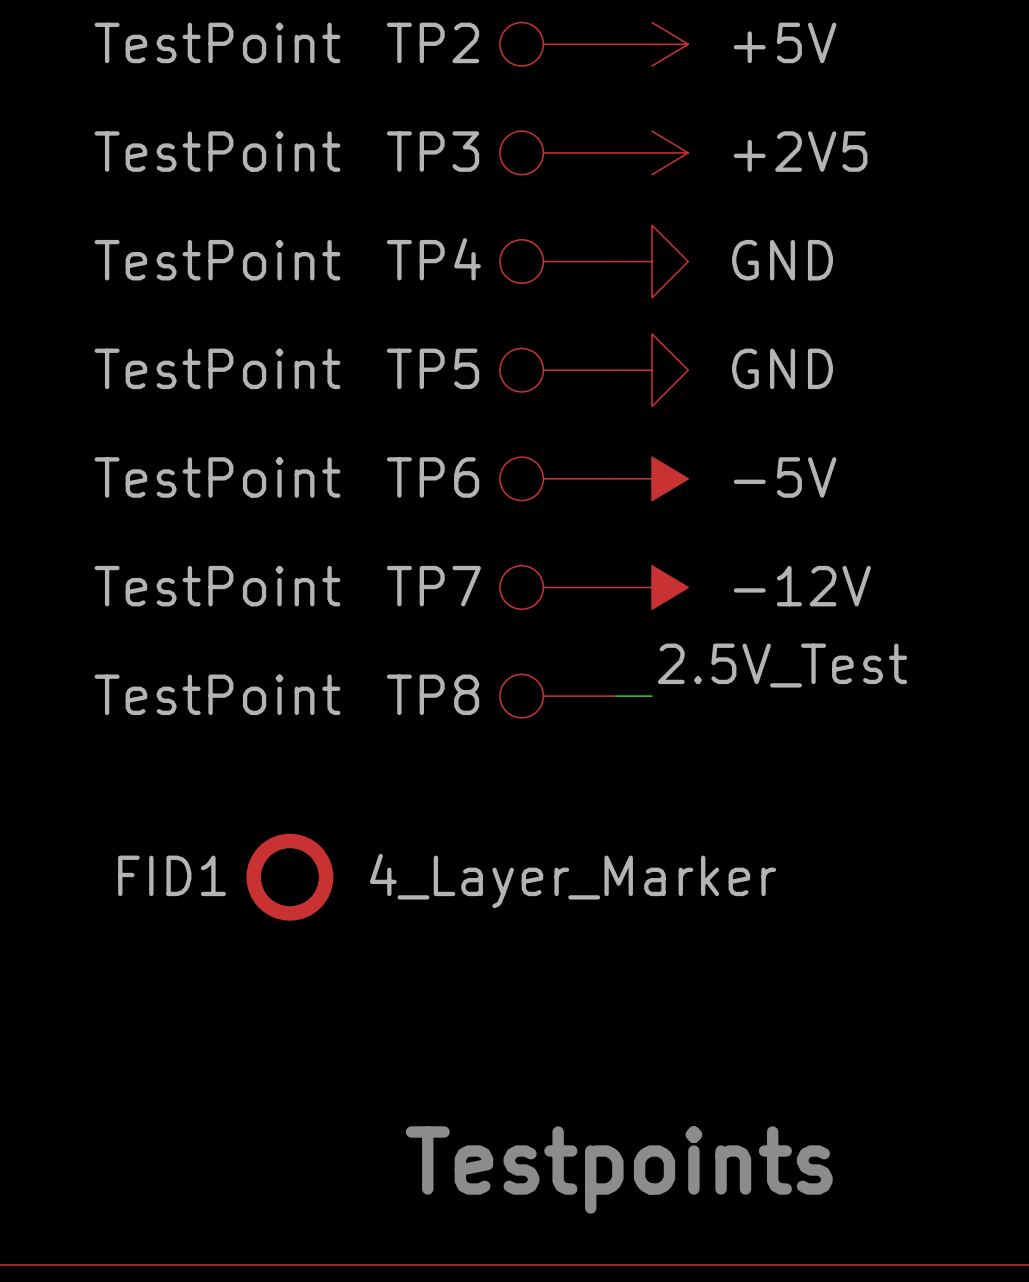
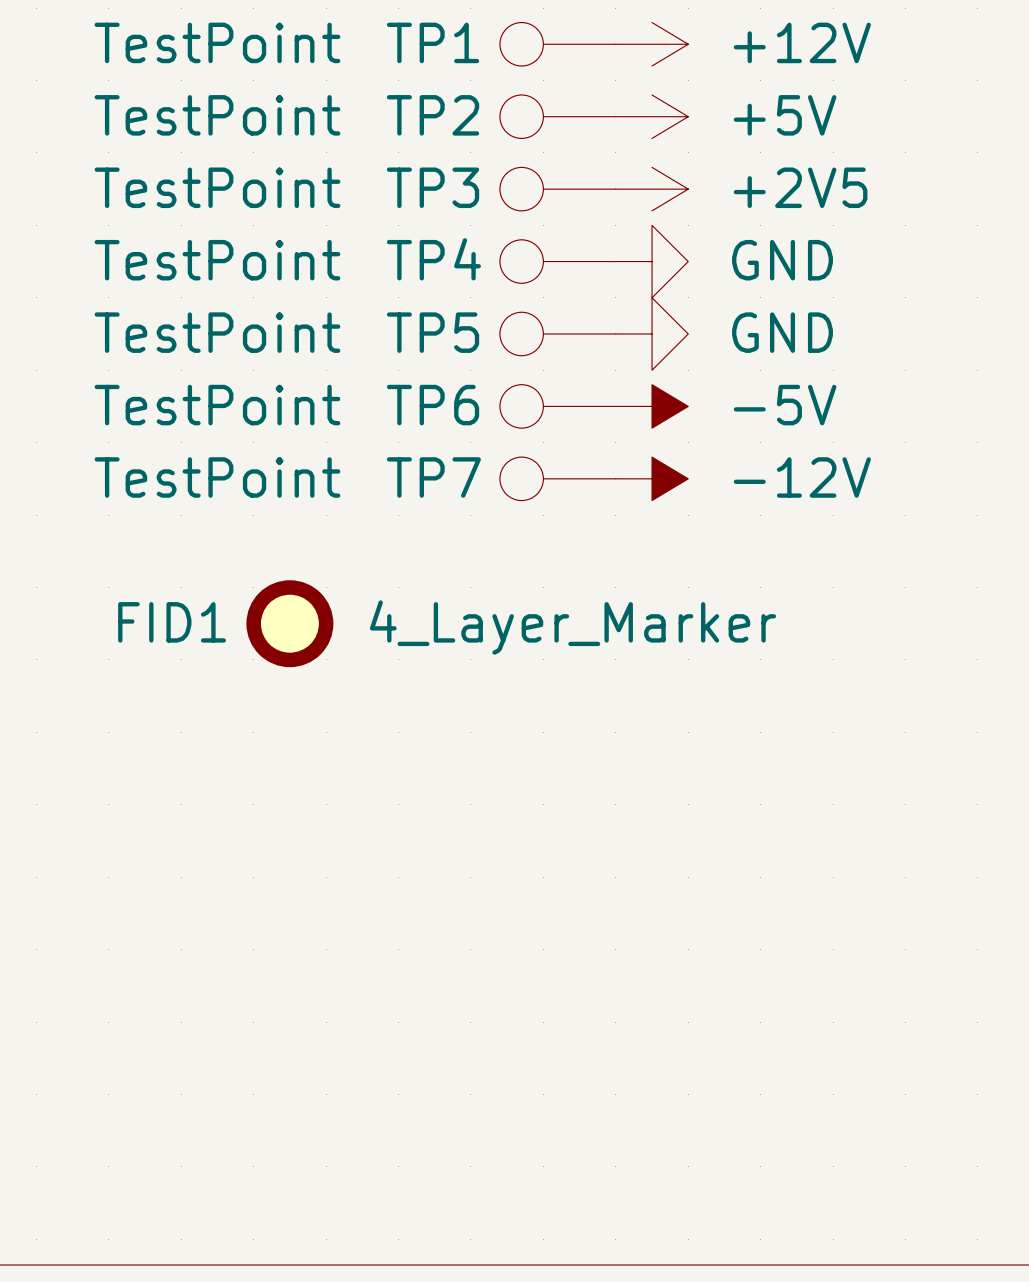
TP2 name: TP2 (433, 42) -> TP1 (433, 42)
power symbol: +5V (652, 44) -> +12V (652, 44)
TP2: none -> TestPoint (557, 116)
power symbol: none -> +5V (652, 116)
TP3 position: (557, 152) -> (557, 189)
power symbol position: +2V5 (652, 152) -> +2V5 (652, 189)
TP5 position: (557, 370) -> (557, 333)
power symbol position: GND (652, 370) -> GND (652, 333)
TP6: none -> TestPoint (557, 406)
power symbol: none -> -5V (652, 406)
TP6 name: TP6 (433, 477) -> TP7 (433, 477)
power symbol: -5V (652, 478) -> -12V (652, 478)
TP7: TestPoint (557, 587) -> none
power symbol: -12V (652, 587) -> none
label: 2.5V_Test (782, 665) -> none
TP8: TestPoint (557, 696) -> none
wire: (615, 696) (652, 696) -> none
FID1 position: (289, 877) -> (289, 623)
text: Testpoints (619, 1170) -> none

